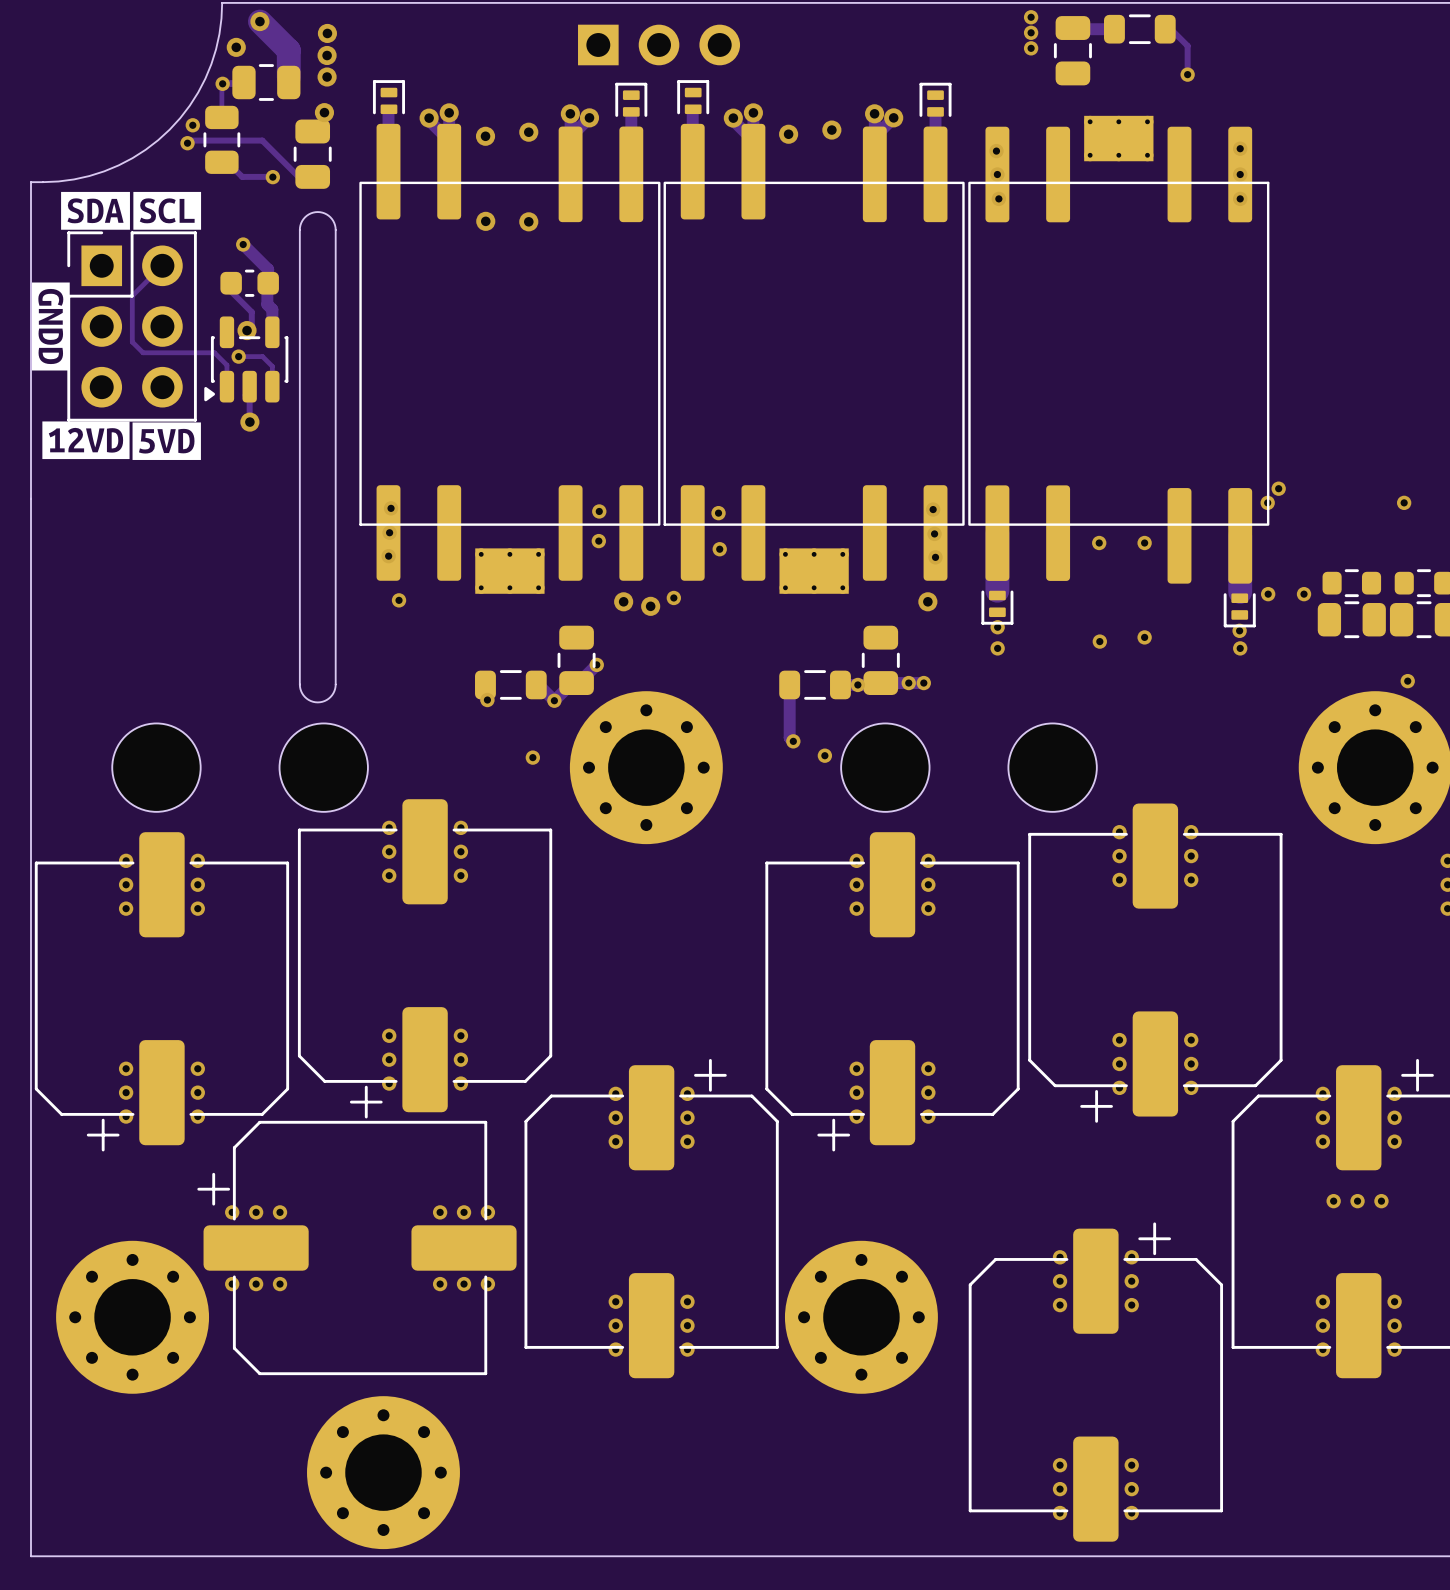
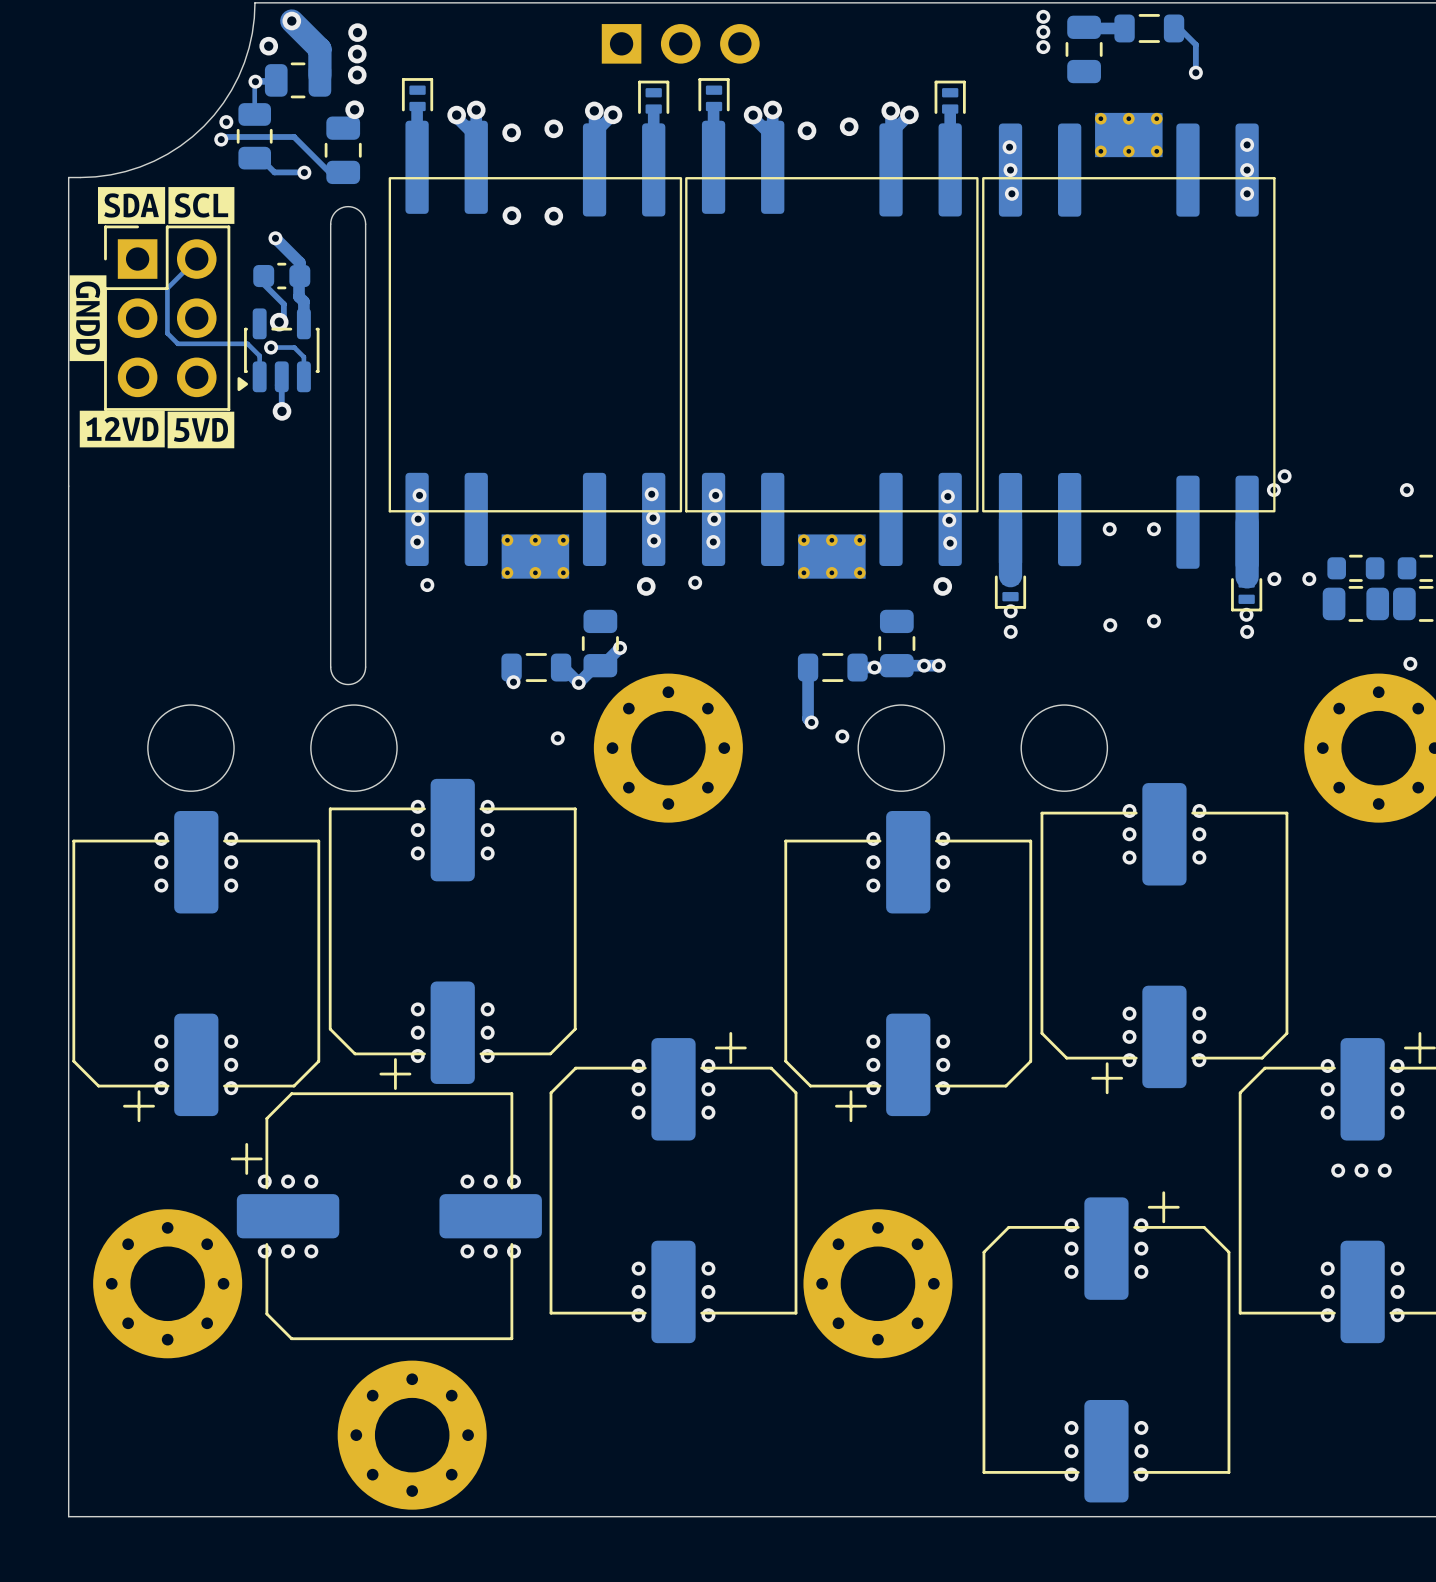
via: none -> (651, 494)
via: none -> (715, 495)
via: (599, 511) -> none
via: (718, 513) -> none
via: none -> (653, 518)
via: none -> (714, 519)
via: (598, 541) -> none
via: (719, 549) -> none
via: none -> (654, 540)
via: none -> (713, 542)
via: (650, 606) -> none

